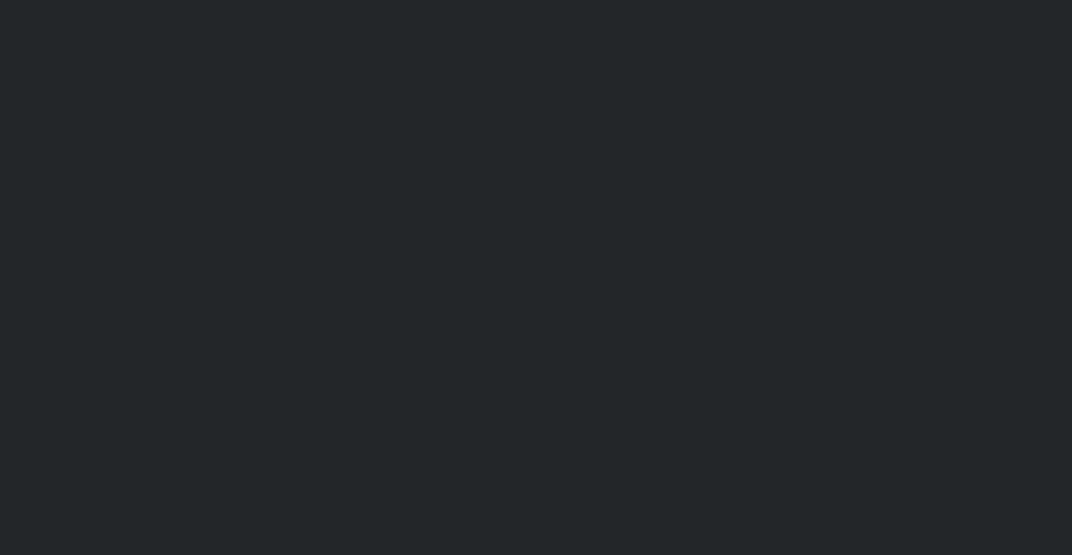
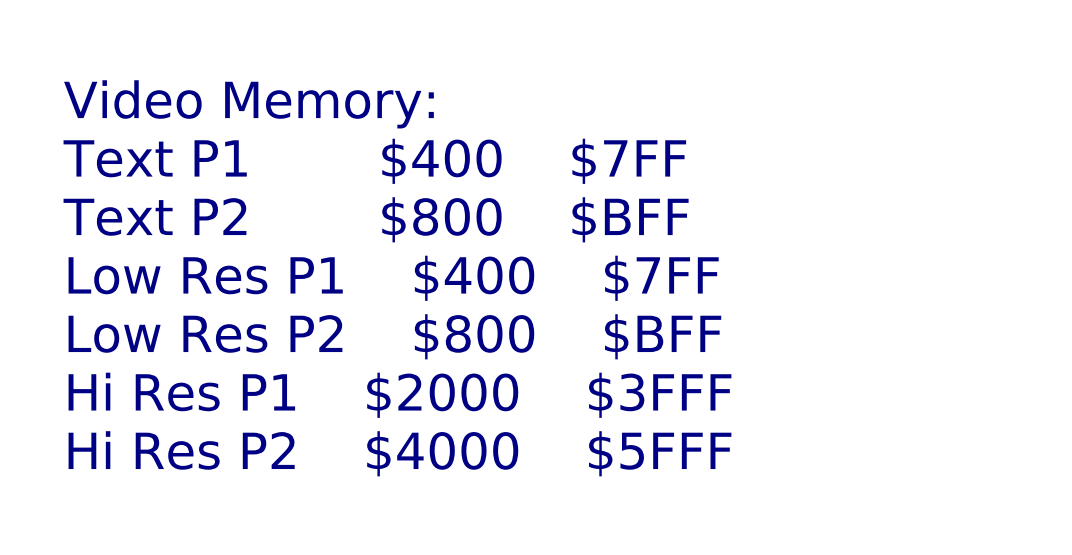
text: none -> Video Memory: (248, 104)
text: none -> Text P1 $400 $7FF (374, 161)
text: none -> Text P2 $800 $BFF (376, 219)
text: none -> Low Res P1 $400 $7FF (393, 278)
text: none -> Low Res P2 $800 $BFF (394, 336)
text: none -> Hi Res P1 $2000 $3FFF (399, 395)
text: none -> Hi Res P2 $4000 $5FFF (399, 453)

